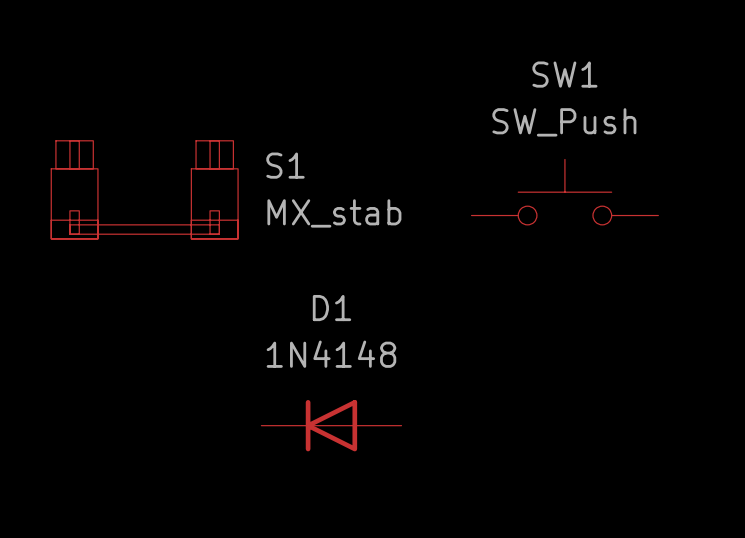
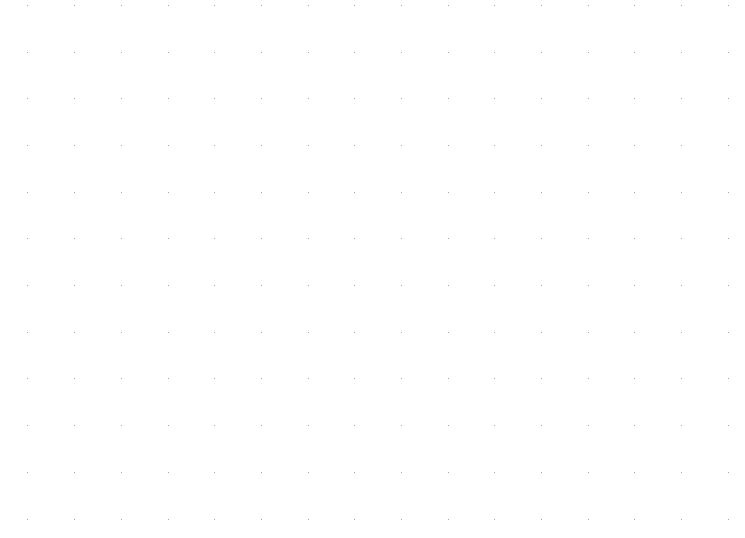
S1: MX_stab (144, 189) -> none
SW1: SW_Push (564, 192) -> none
D1: 1N4148 (331, 425) -> none

